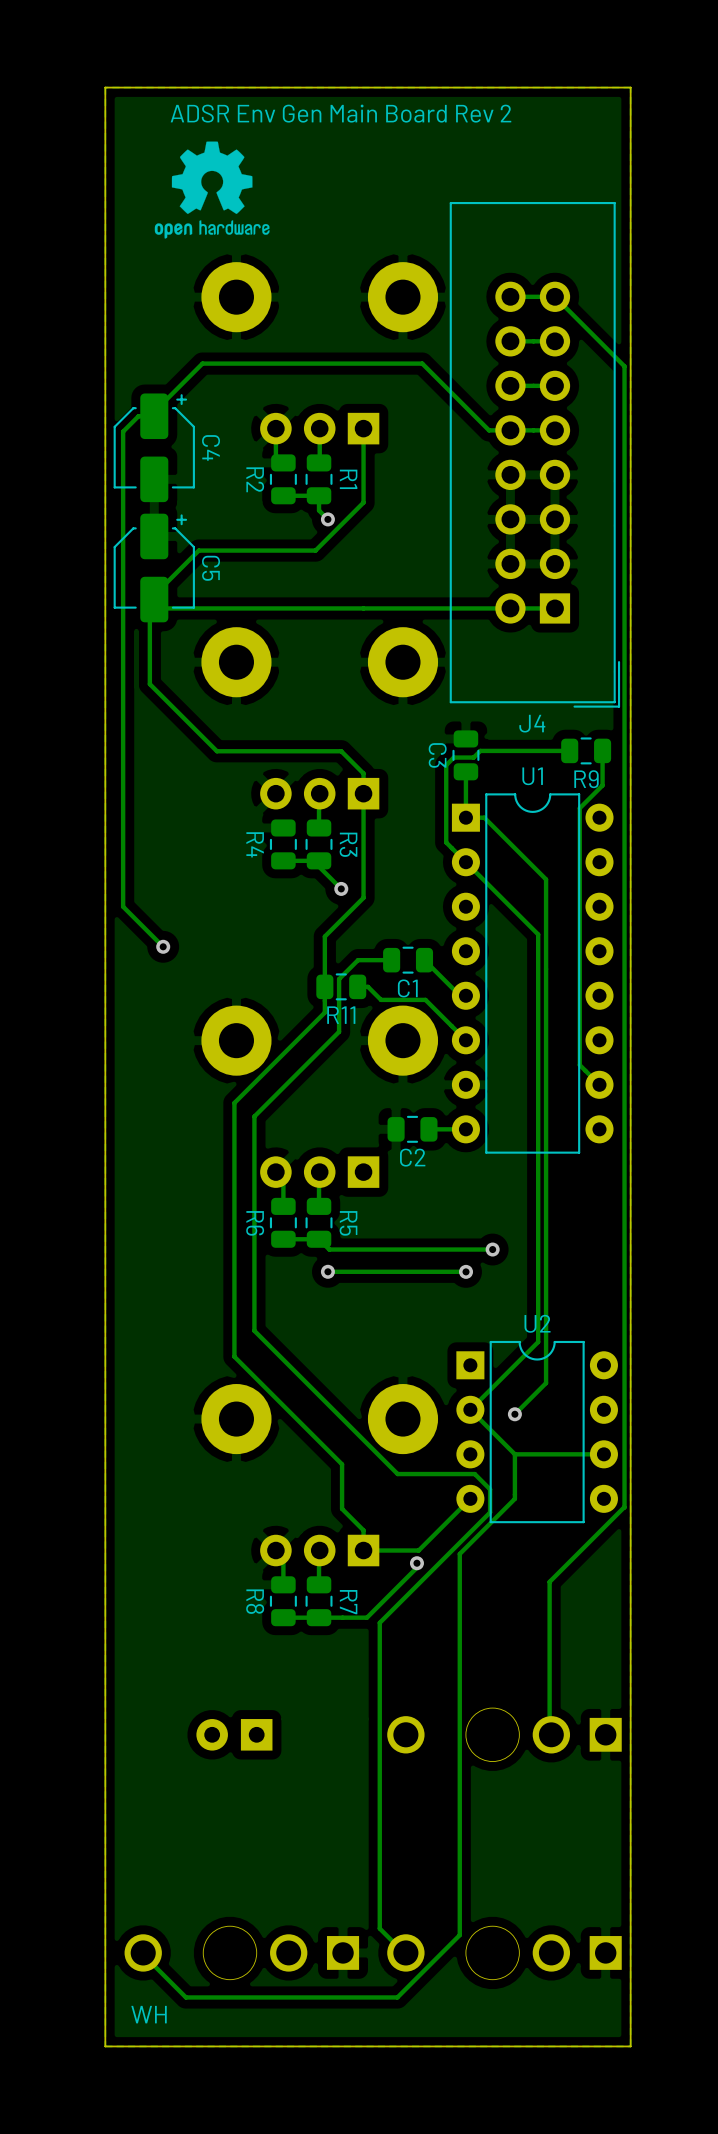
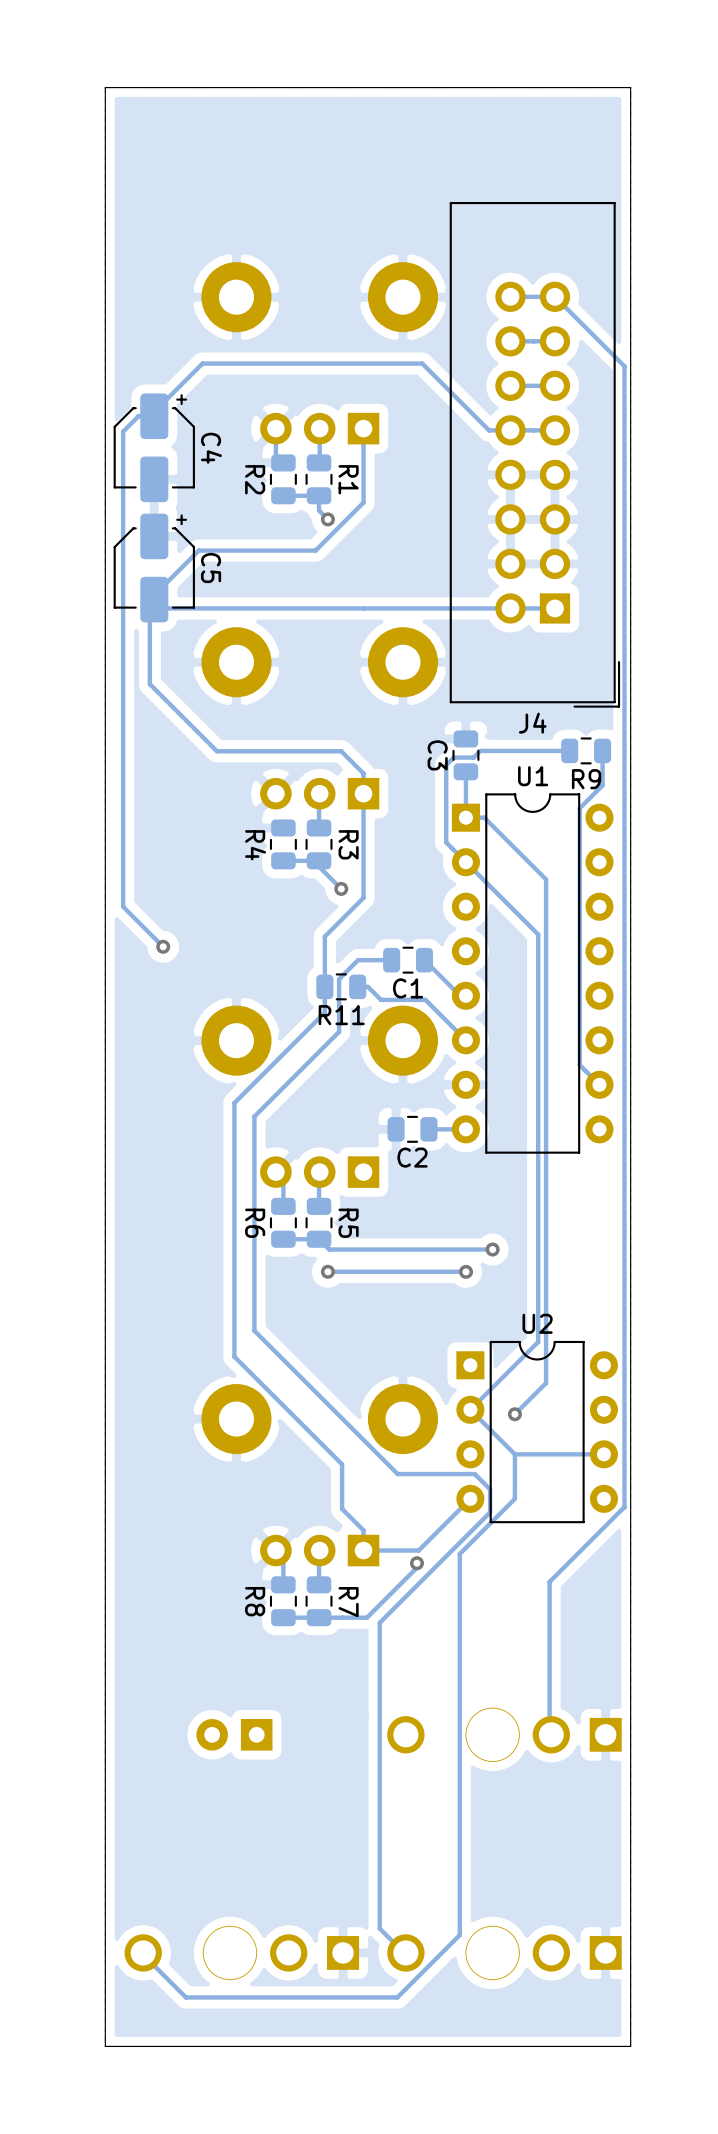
text: ADSR Env Gen Main Board Rev 2 (340, 113) -> none
drawing: [154, 141, 270, 239] -> none
text: WH (149, 2014) -> none

